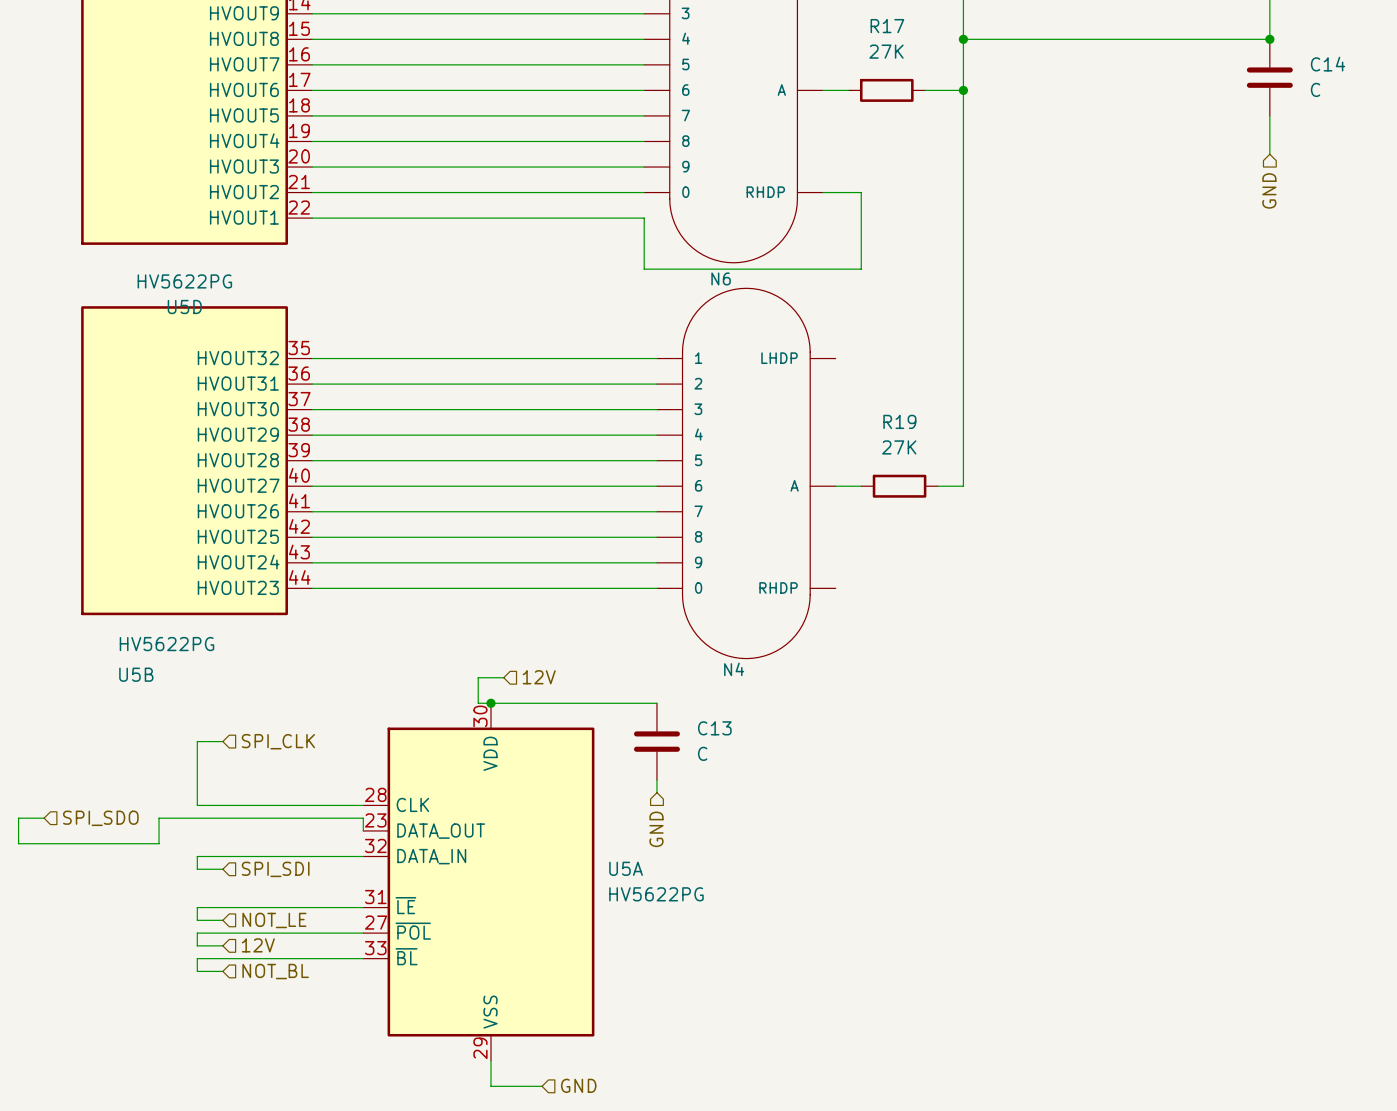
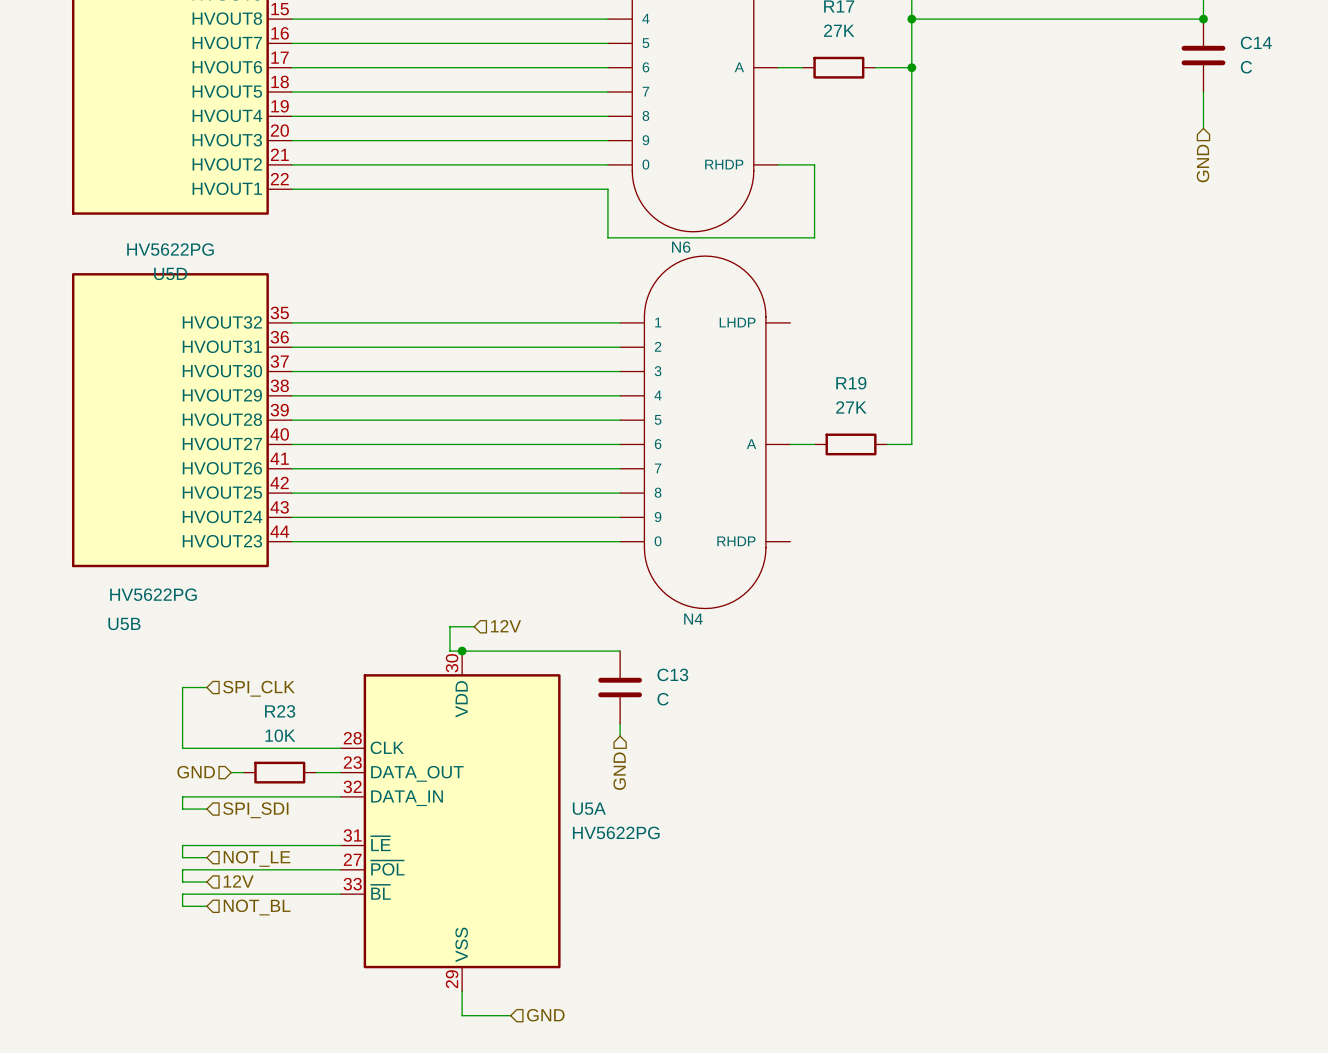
wire: (44, 818) (18, 818) (18, 843) (159, 843) (159, 818) (363, 818) (363, 830) -> (316, 772) (340, 772)
hierarchical label: SPI_SDO (100, 818) -> none
hierarchical label: none -> GND (196, 772)
wire: none -> (231, 772) (243, 772)
R23: none -> 10K (279, 772)

